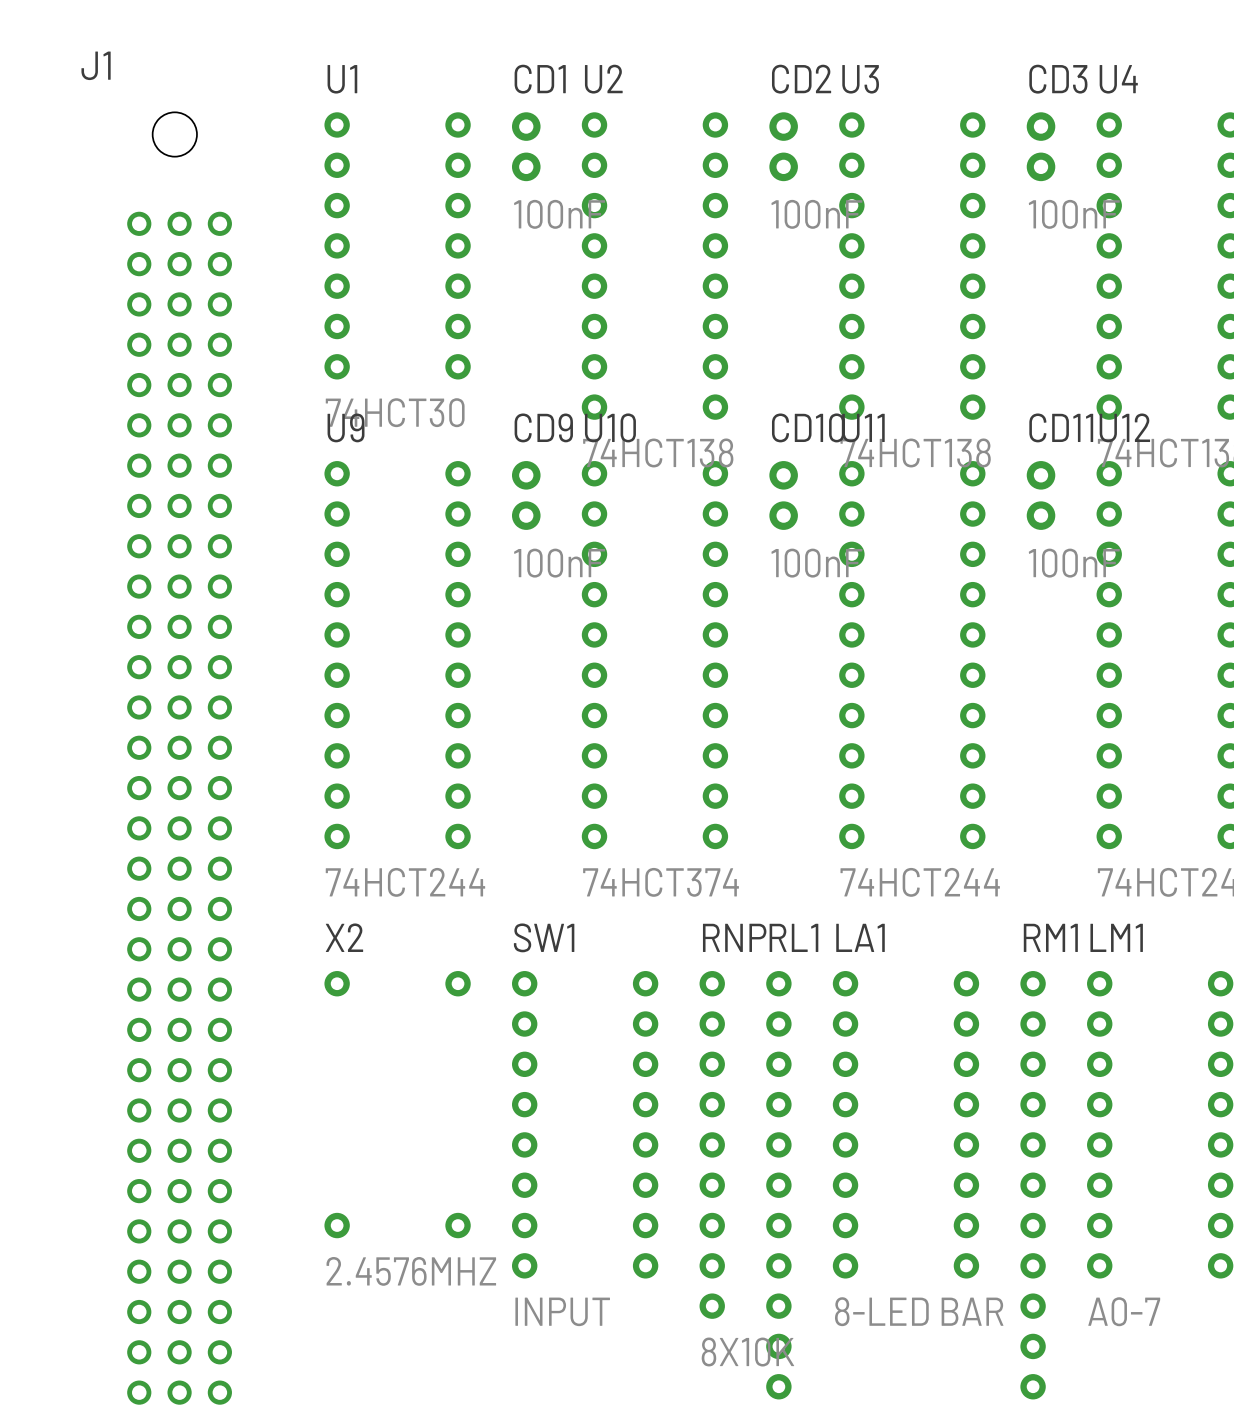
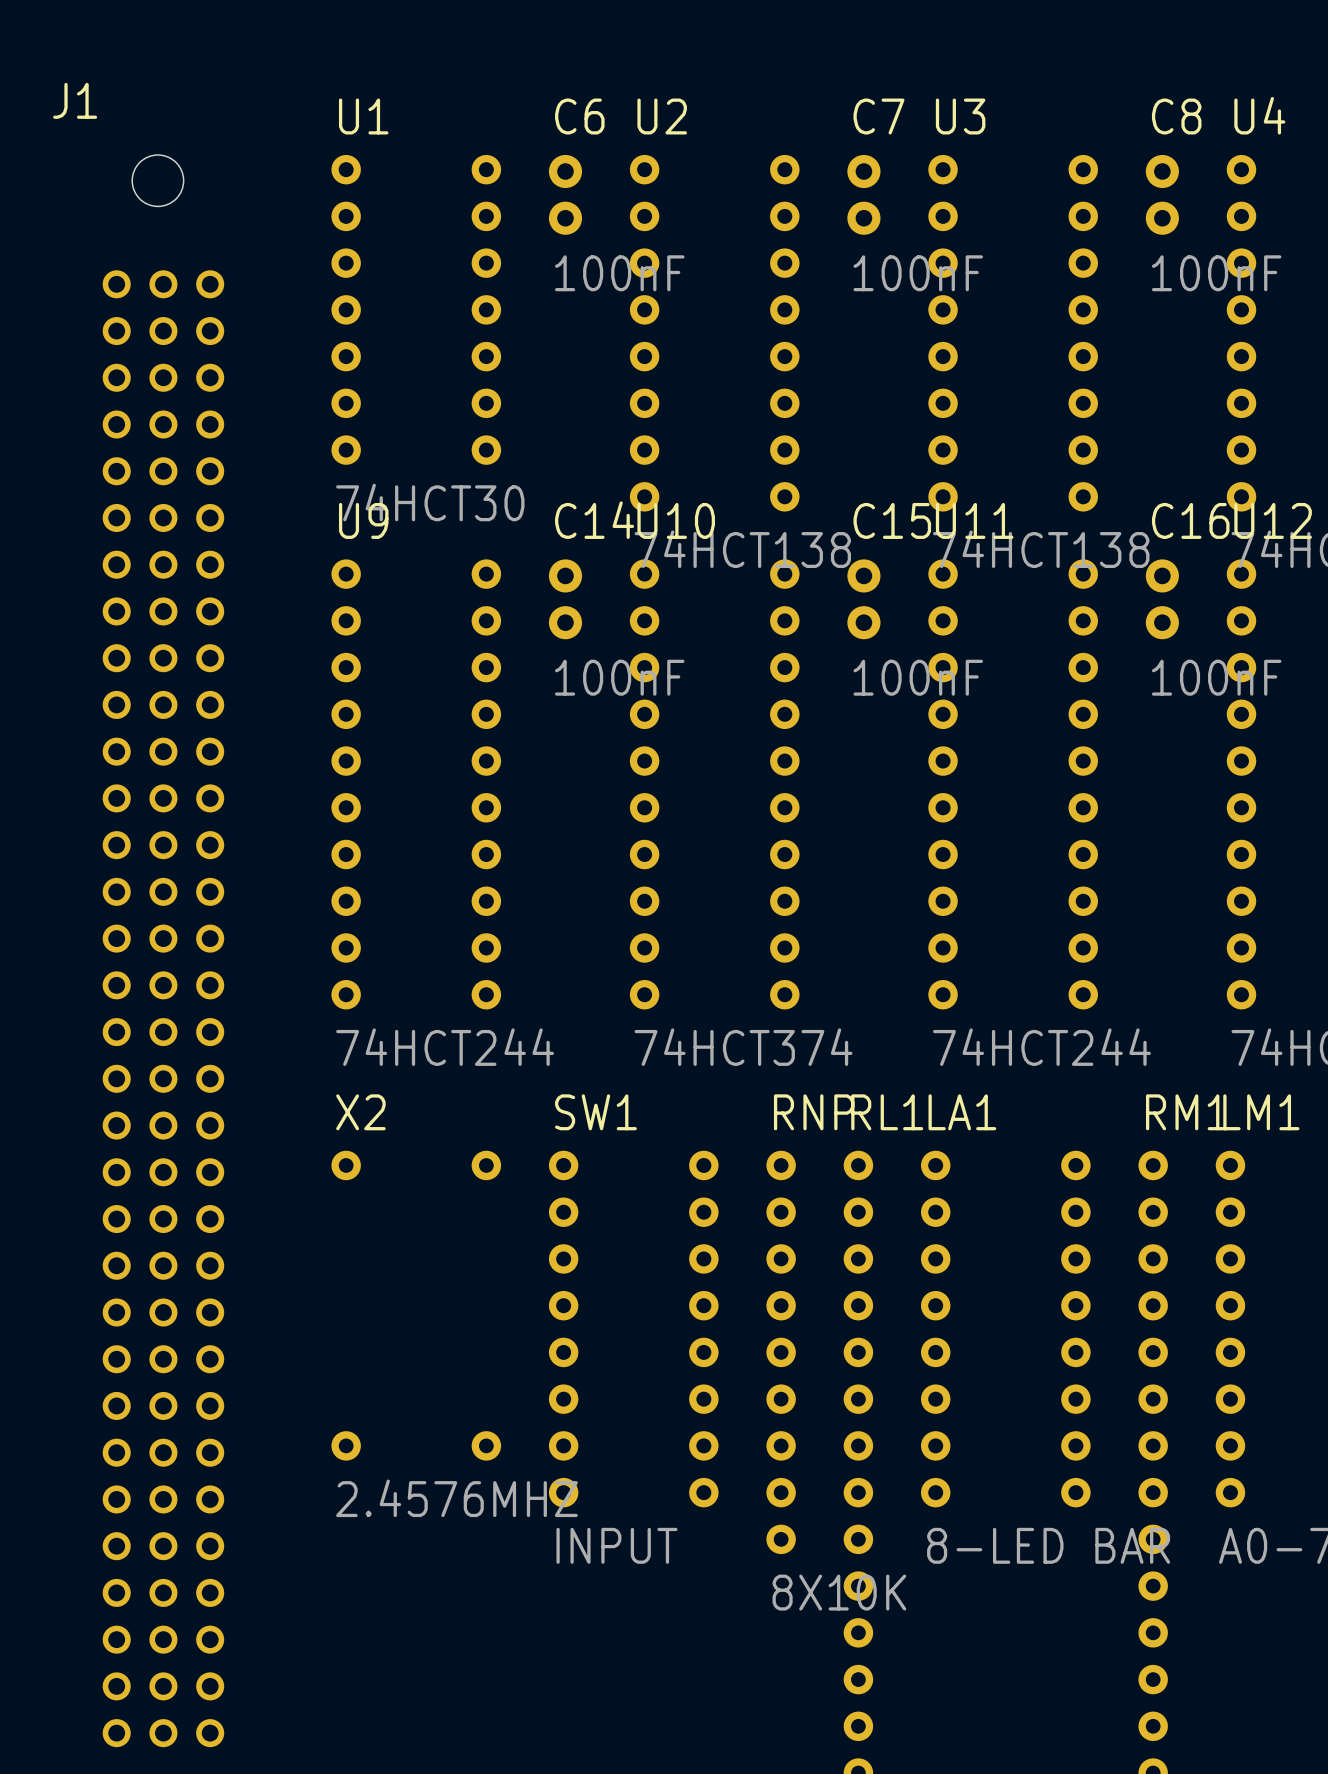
CD1 name: CD1 (540, 79) -> C6 (579, 116)
CD2 name: CD2 (801, 79) -> C7 (878, 116)
CD3 name: CD3 (1058, 79) -> C8 (1176, 116)
CD9 name: CD9 (543, 427) -> C14 (594, 520)
CD10 name: CD10 (808, 427) -> C15 (892, 520)
CD11 name: CD11 (1061, 427) -> C16 (1190, 520)

